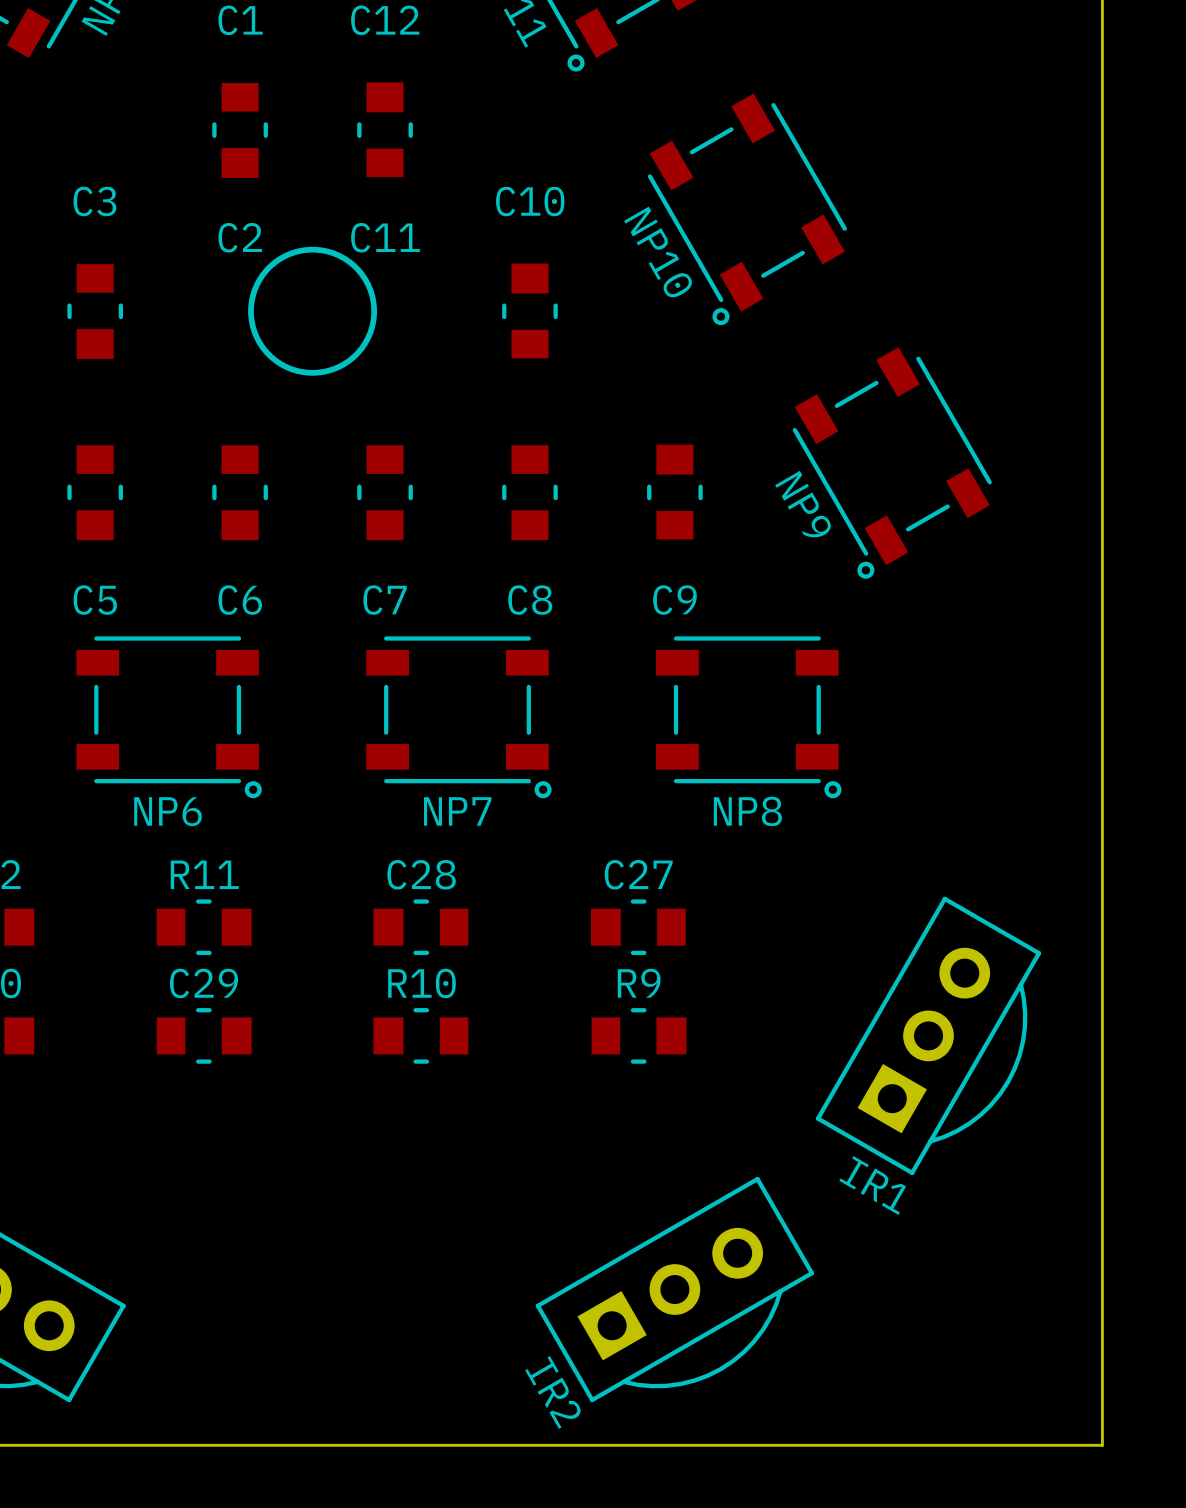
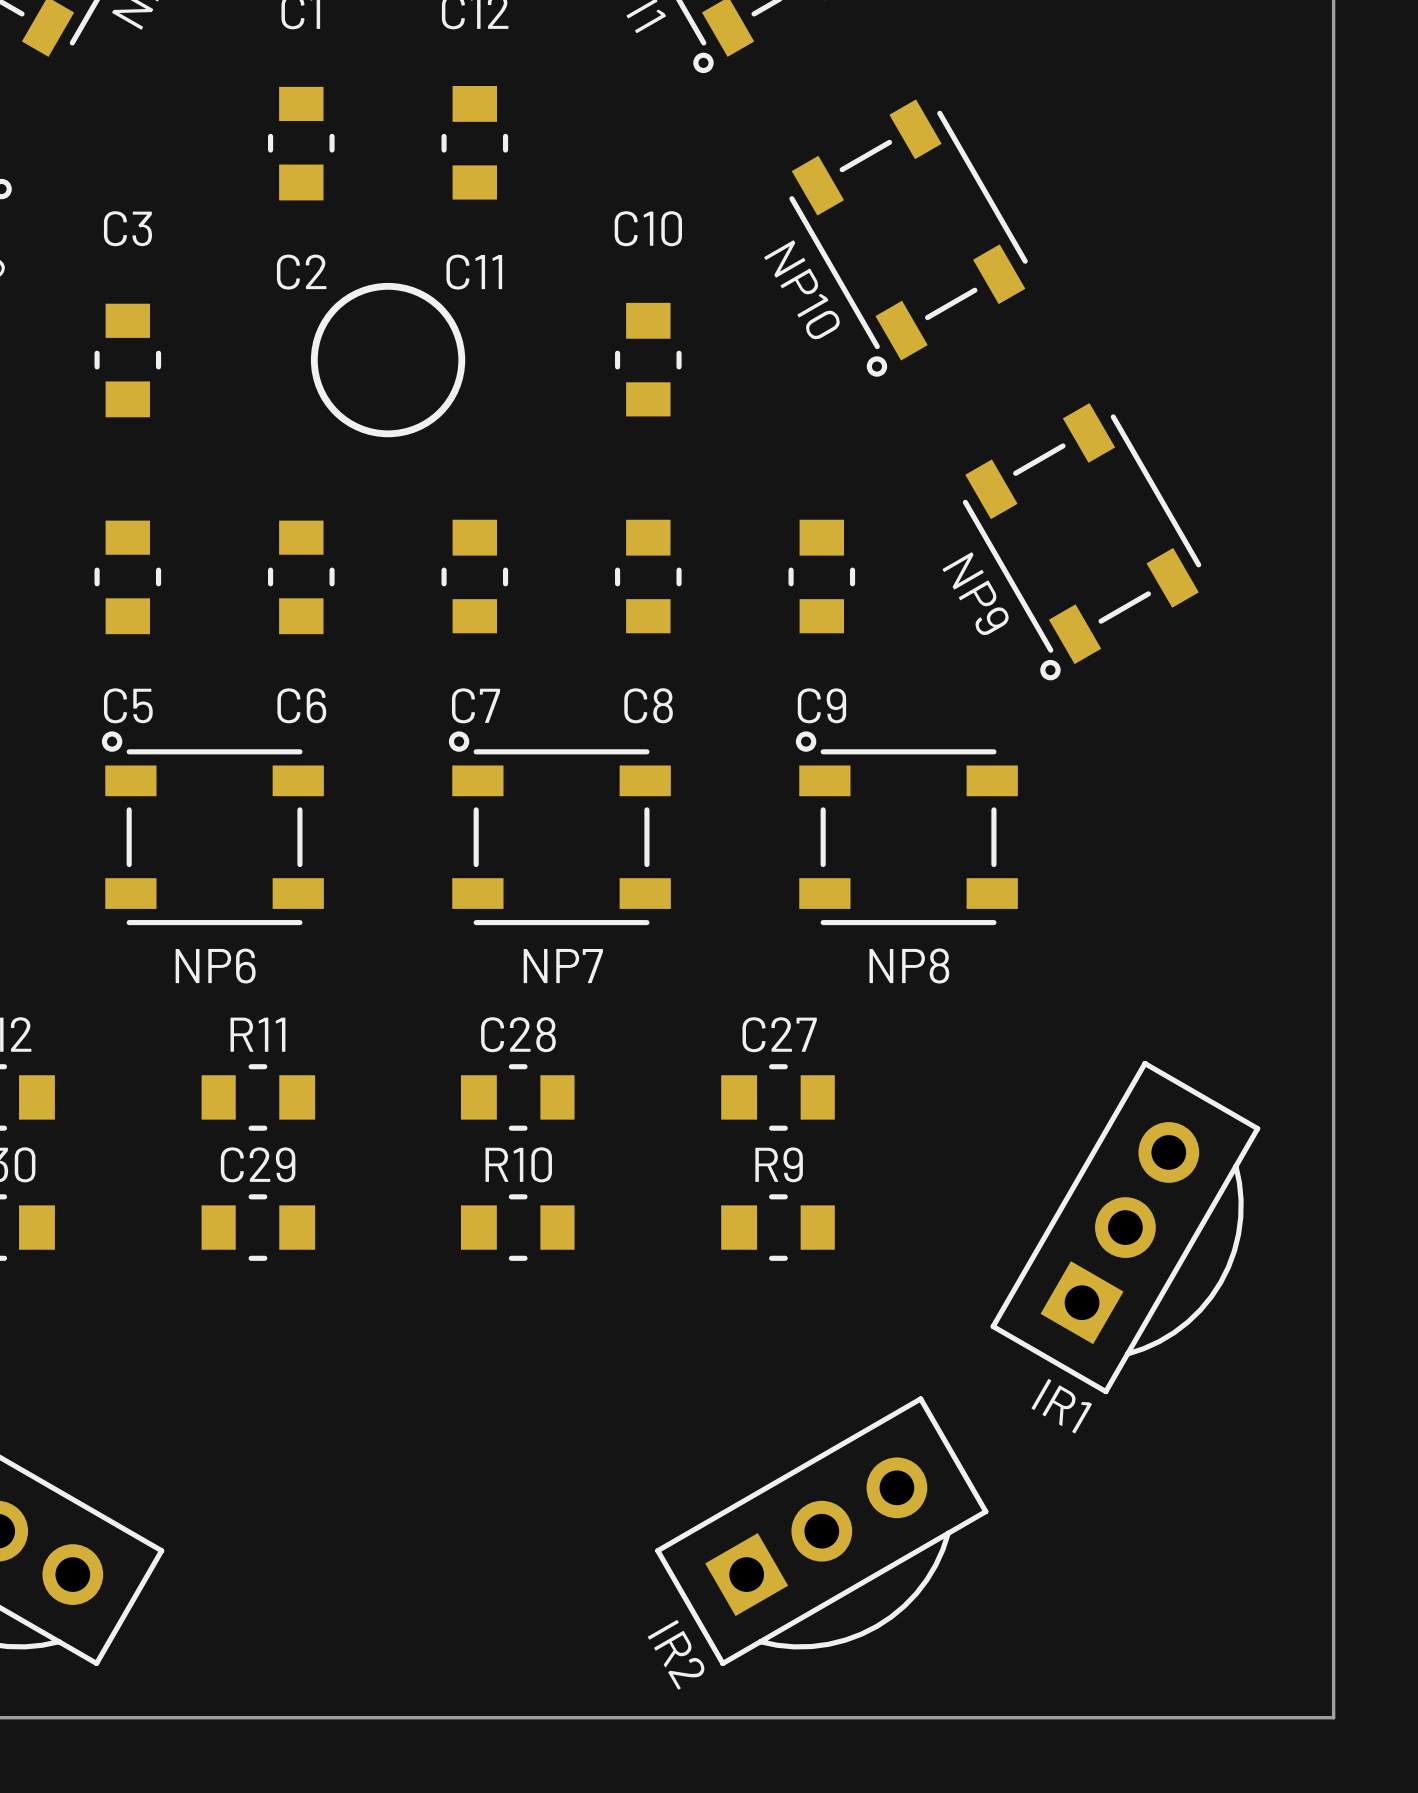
C7 rotation: 0° (385, 492) -> 180° (474, 576)
C8 rotation: 0° (529, 492) -> 180° (648, 576)
NP6 rotation: 0° (169, 717) -> 180° (212, 828)
NP7 rotation: 0° (458, 717) -> 180° (559, 828)
NP8 rotation: 0° (748, 717) -> 180° (906, 828)
R9 rotation: 0° (639, 1035) -> 180° (778, 1227)

